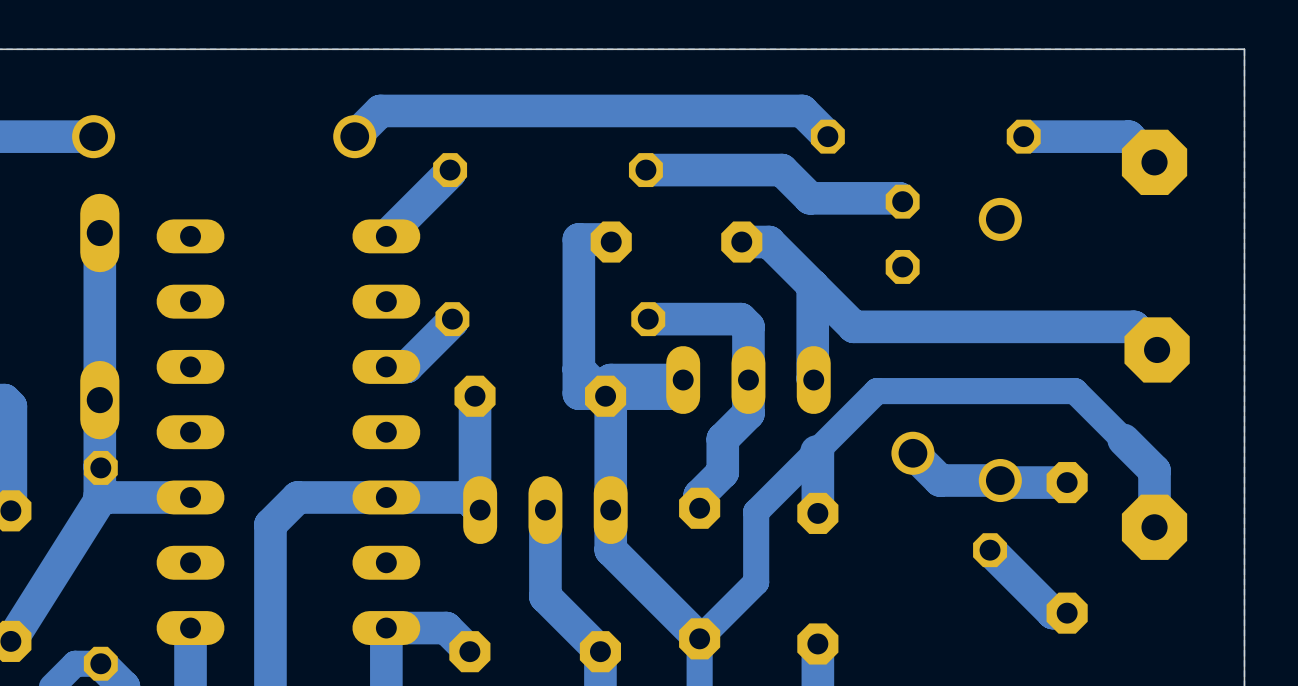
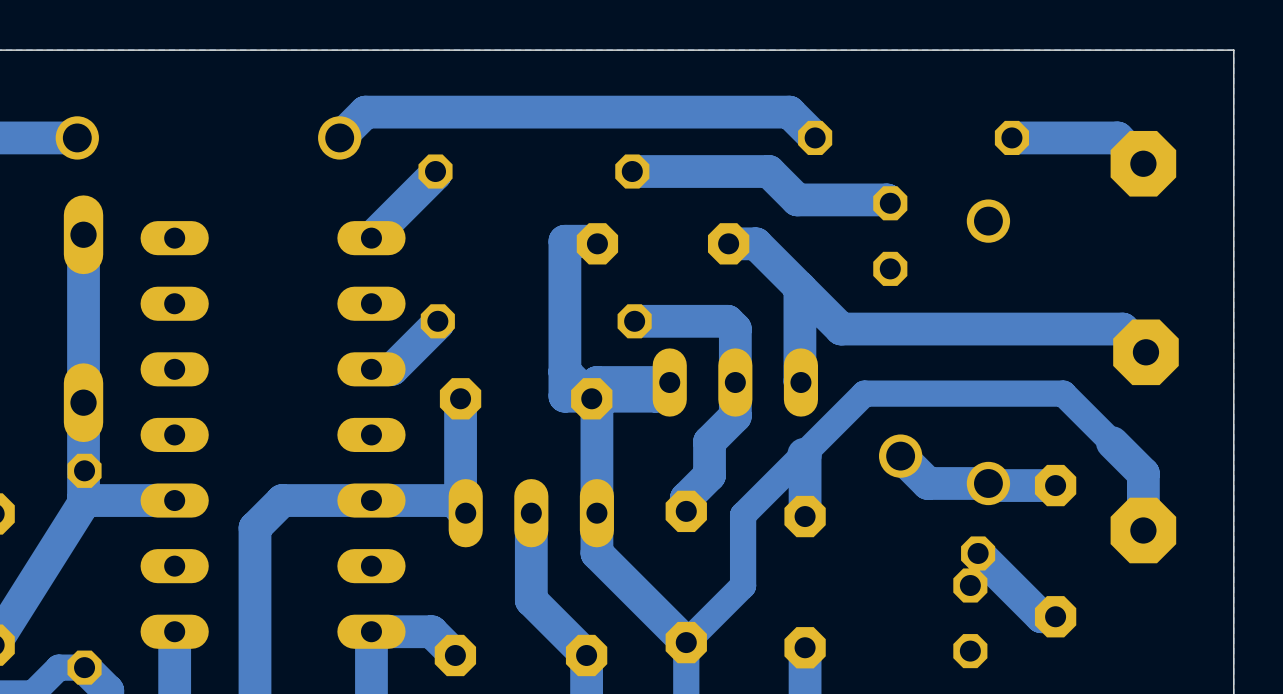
part: none -> (970, 618)

